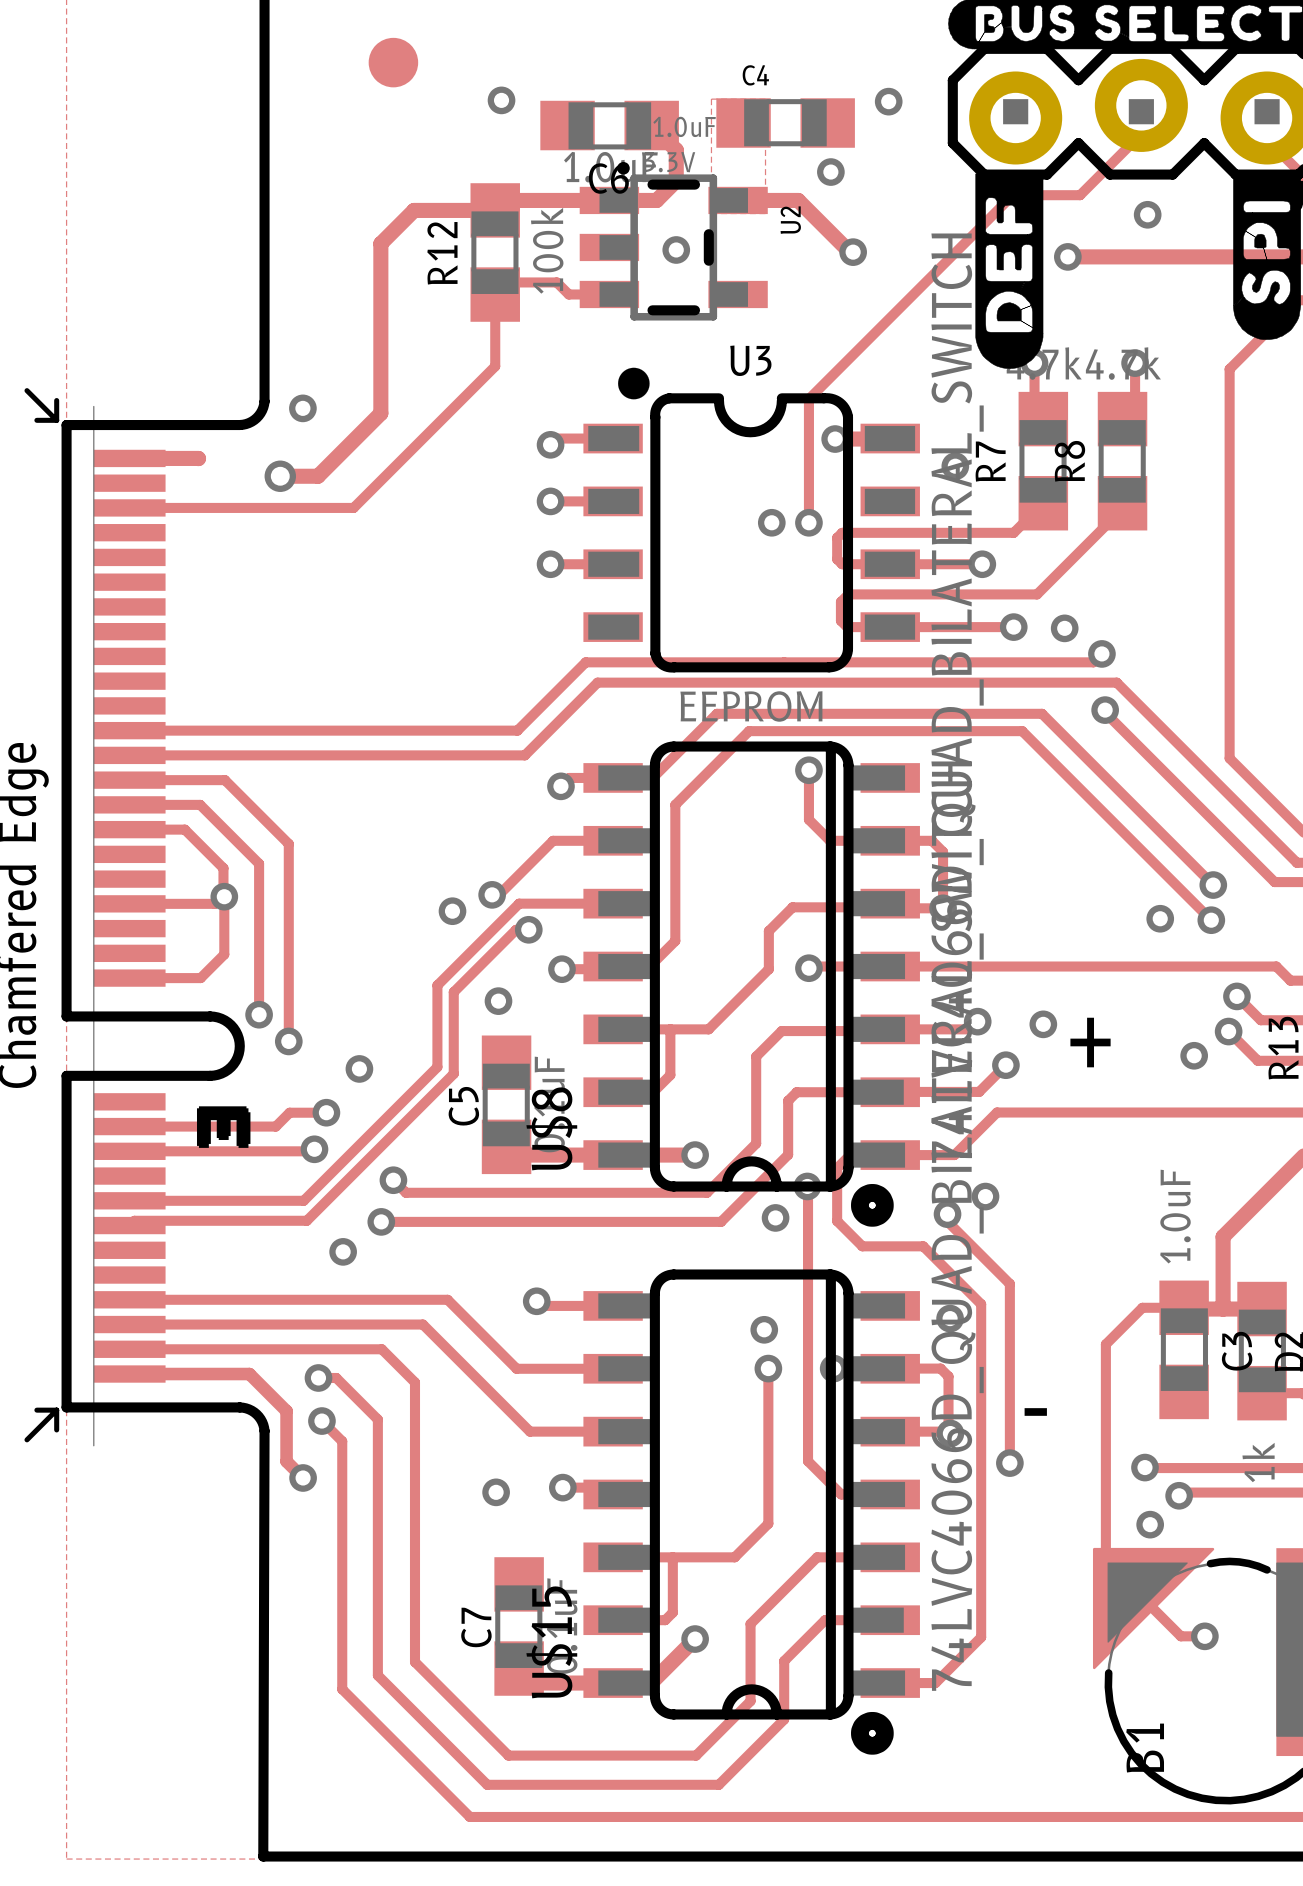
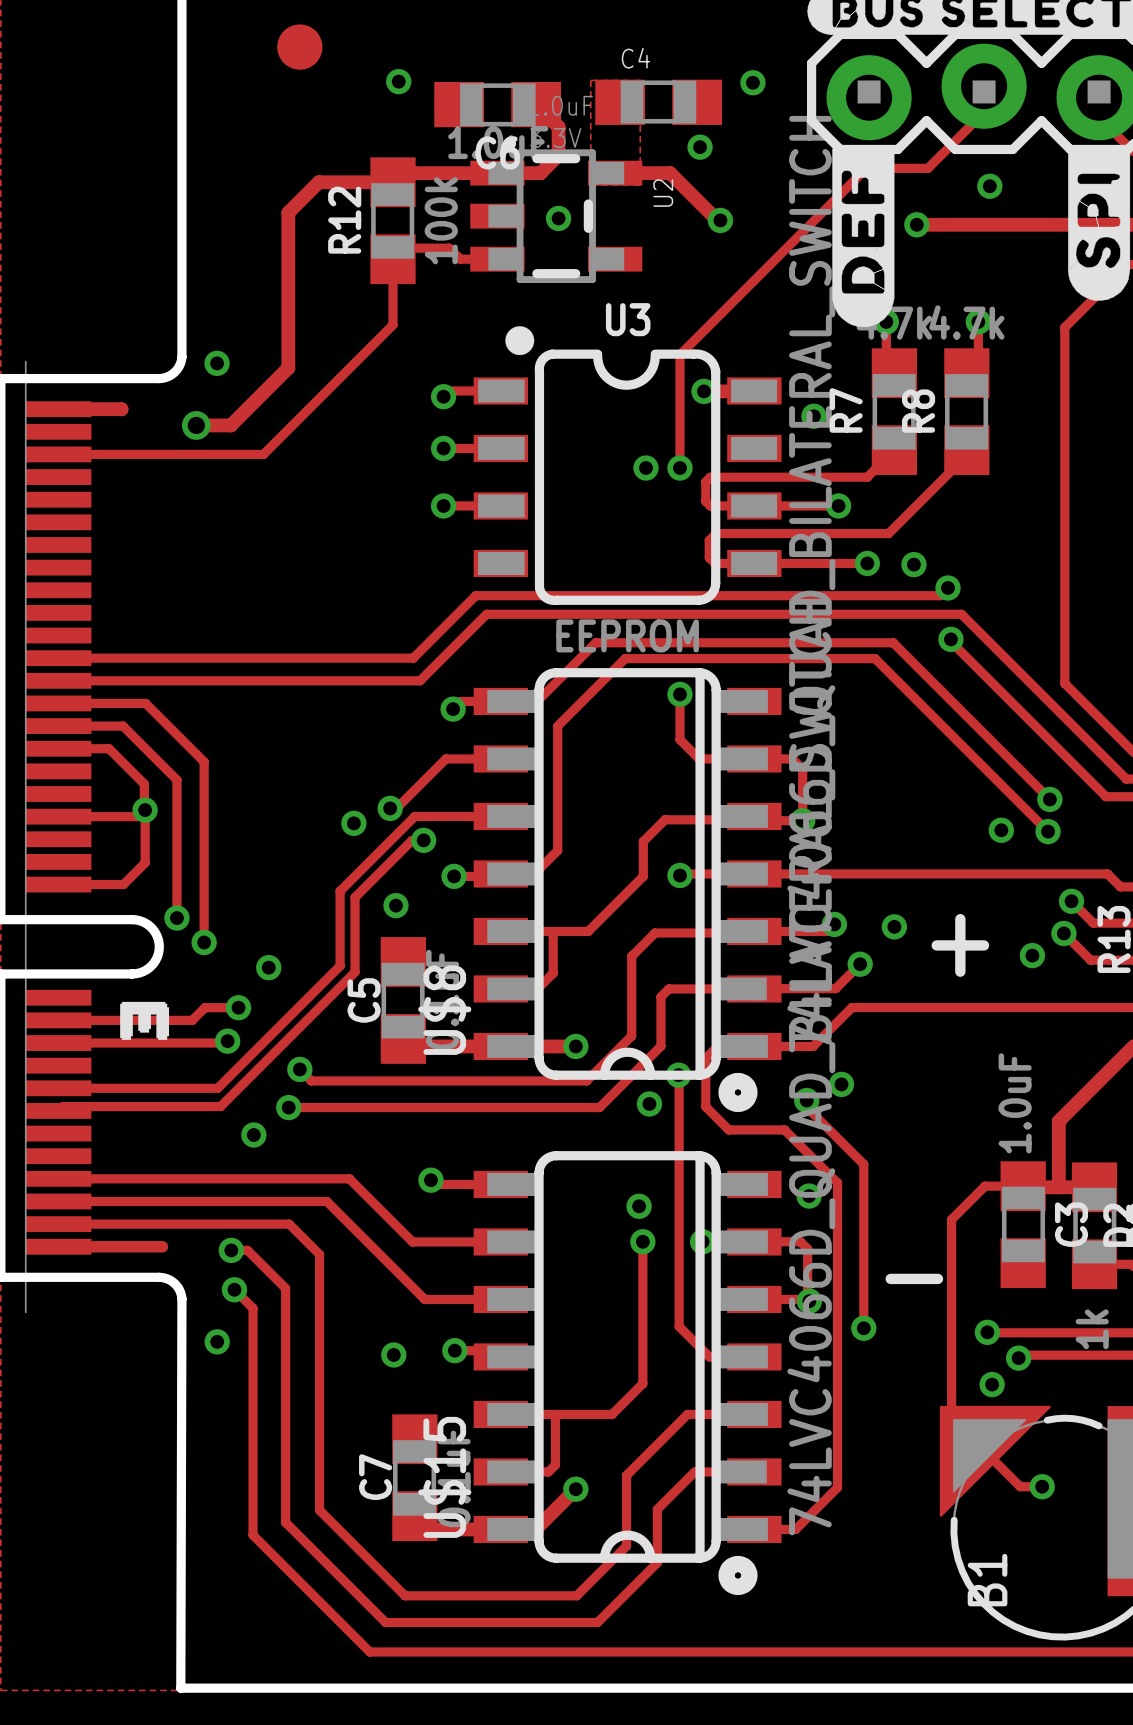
track: (243, 1374) (249, 1374) (286, 1411) (286, 1461) (303, 1477) -> none

